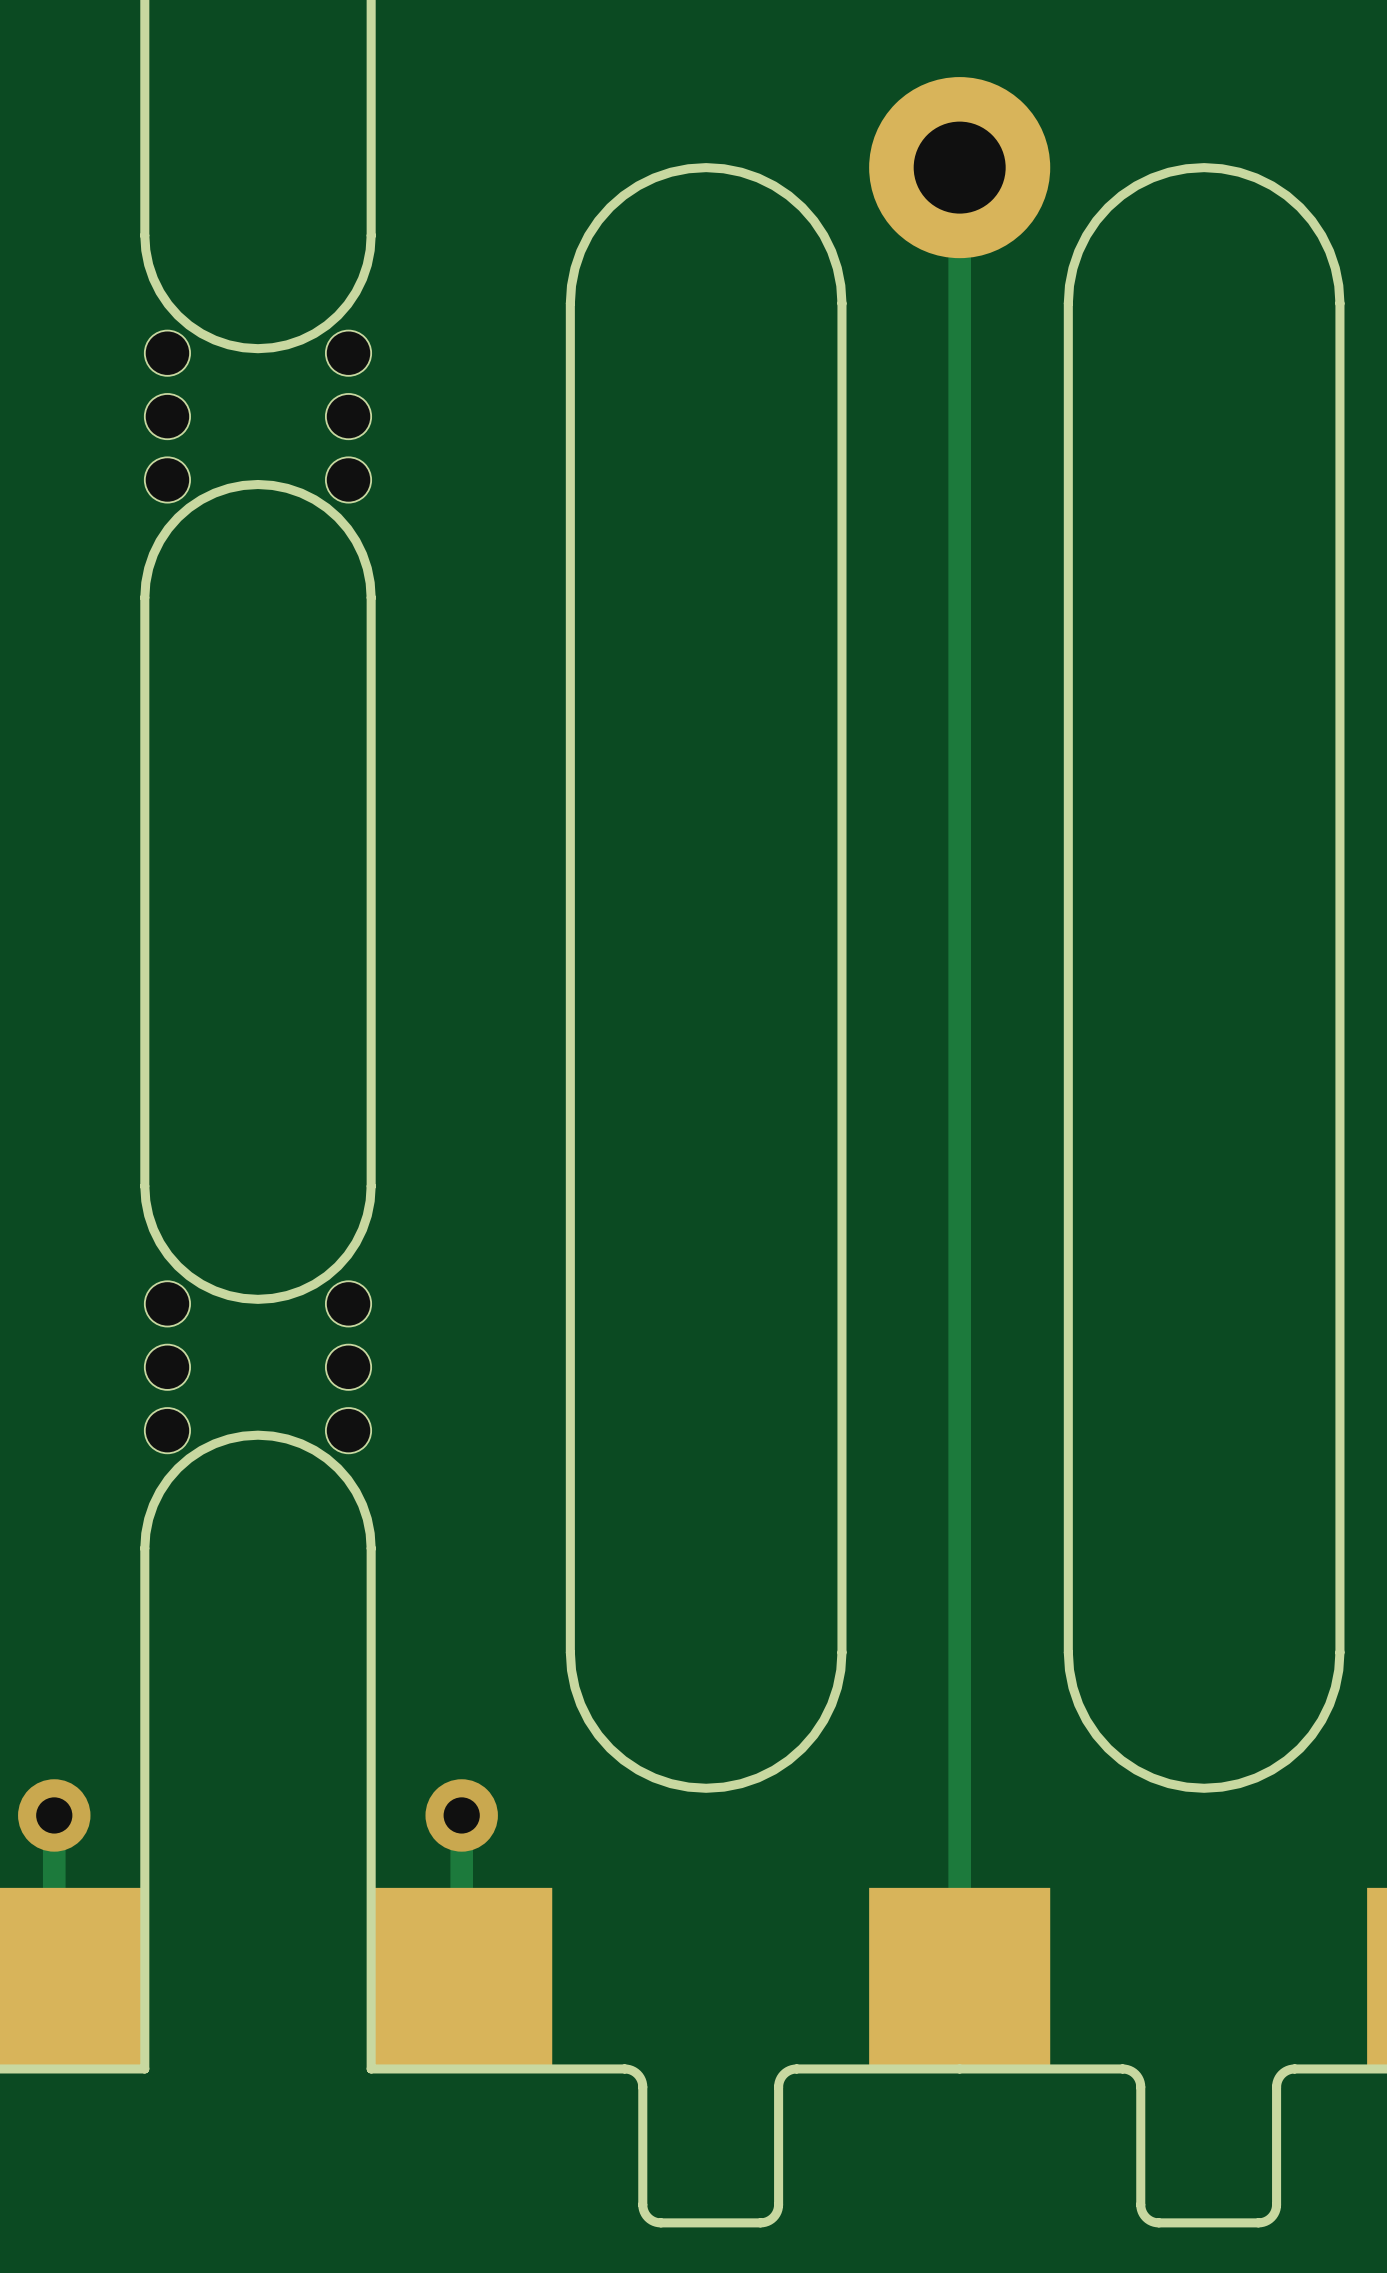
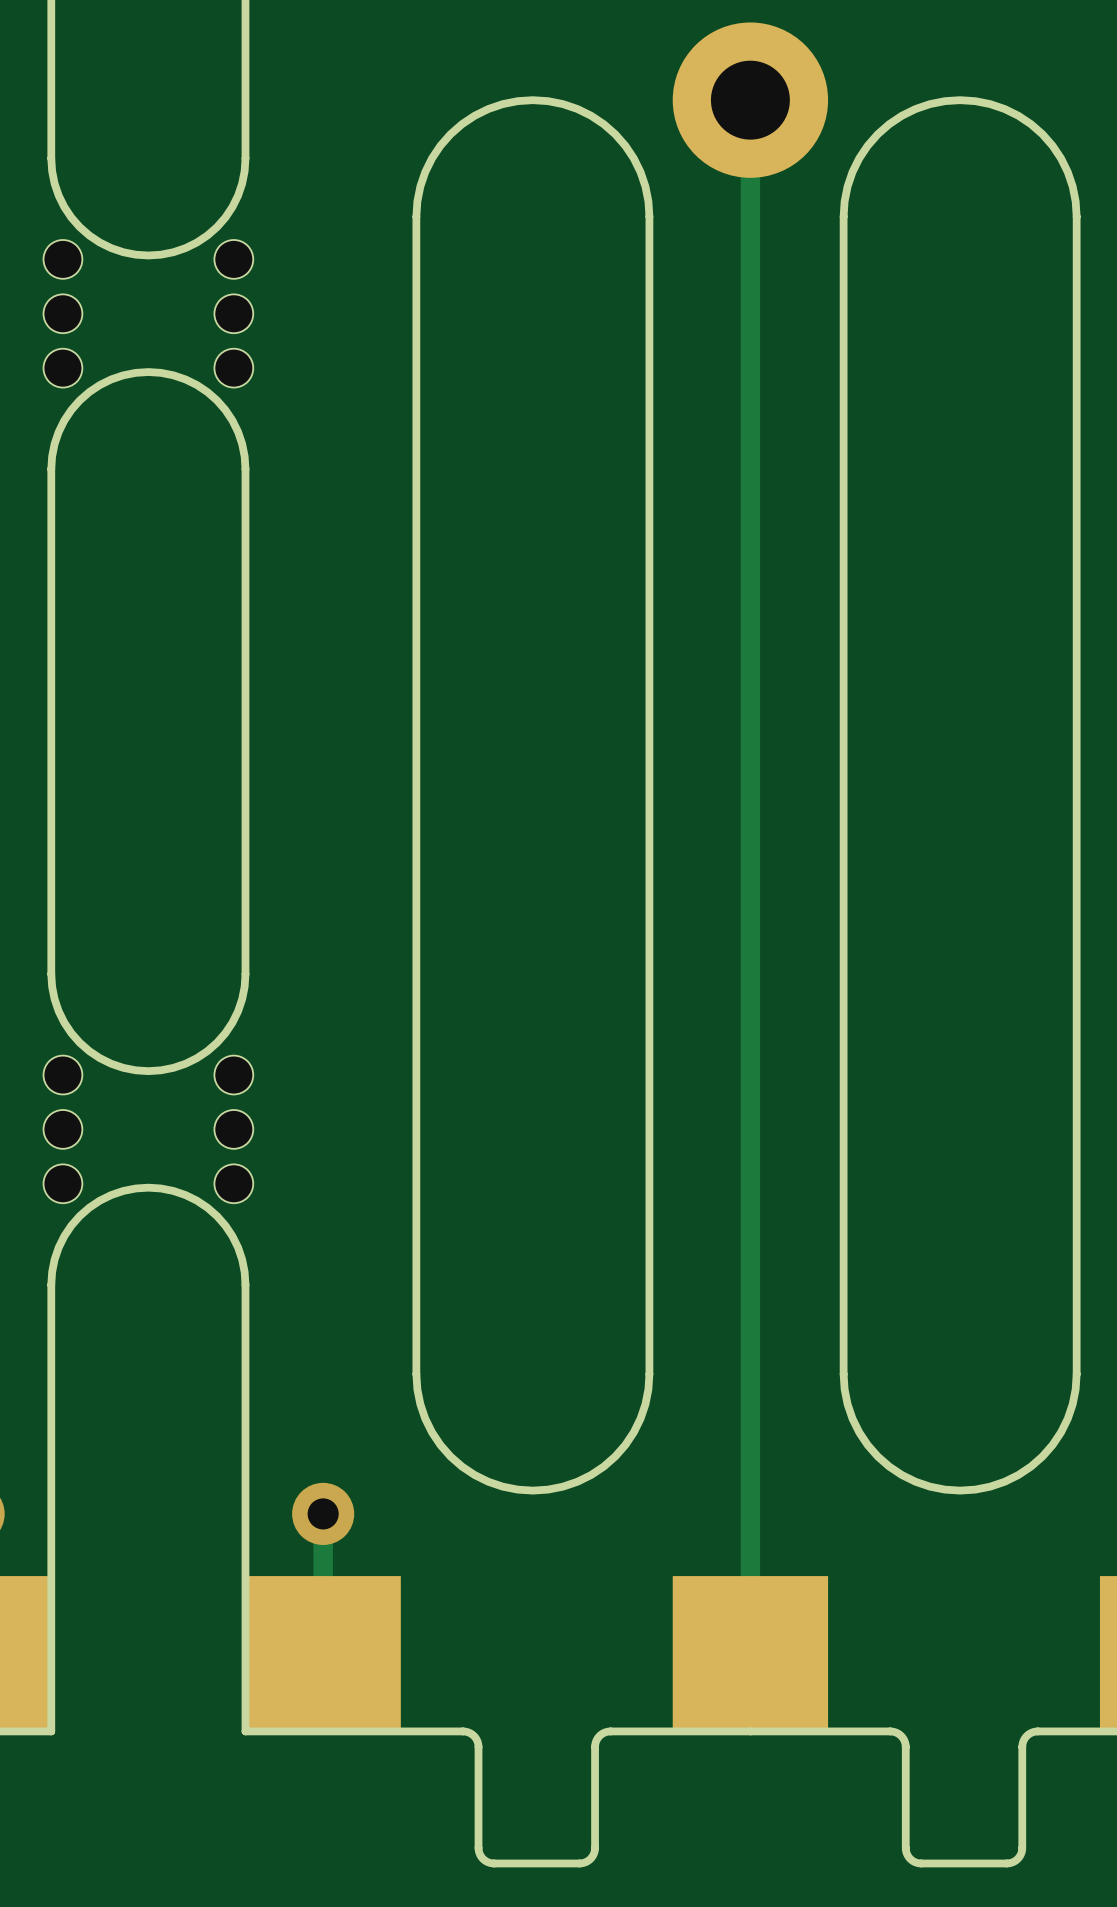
part footprint: [144, 330, 372, 503] -> [43, 239, 254, 388]
part footprint: [144, 1281, 372, 1454] -> [43, 1055, 254, 1204]

